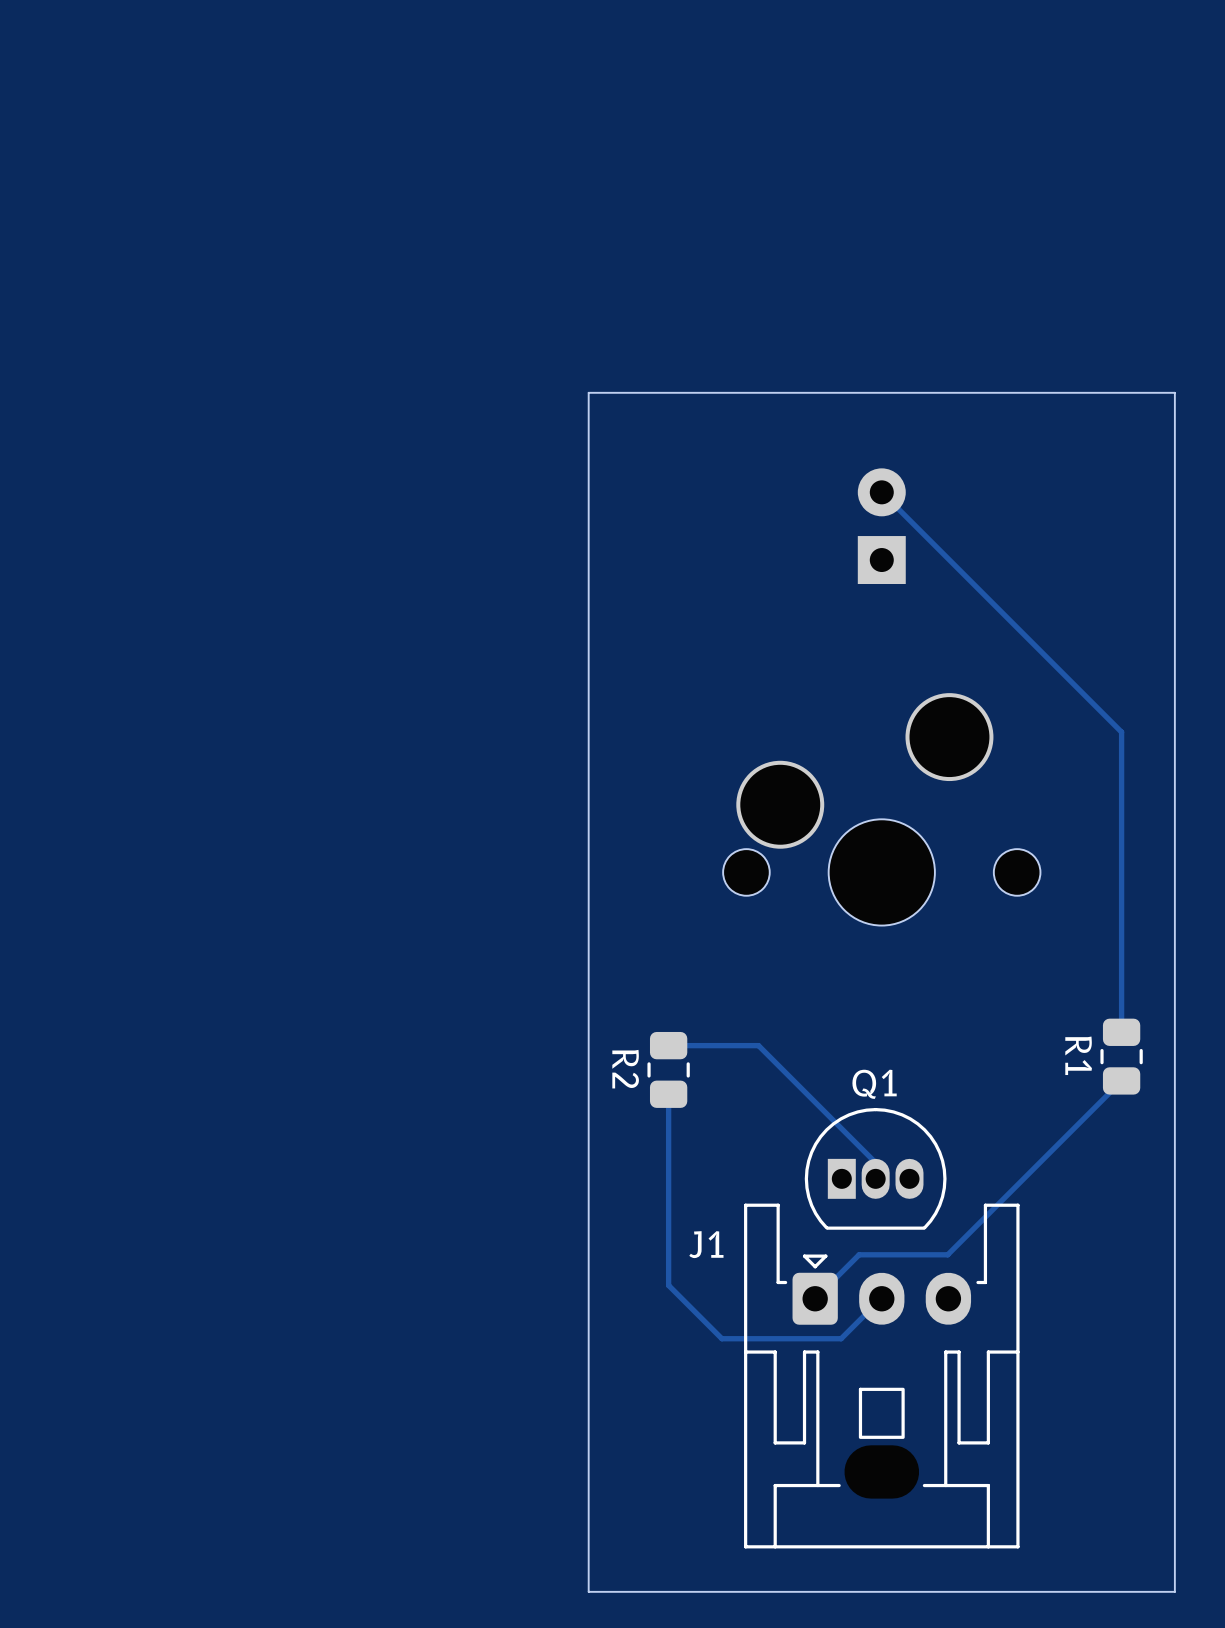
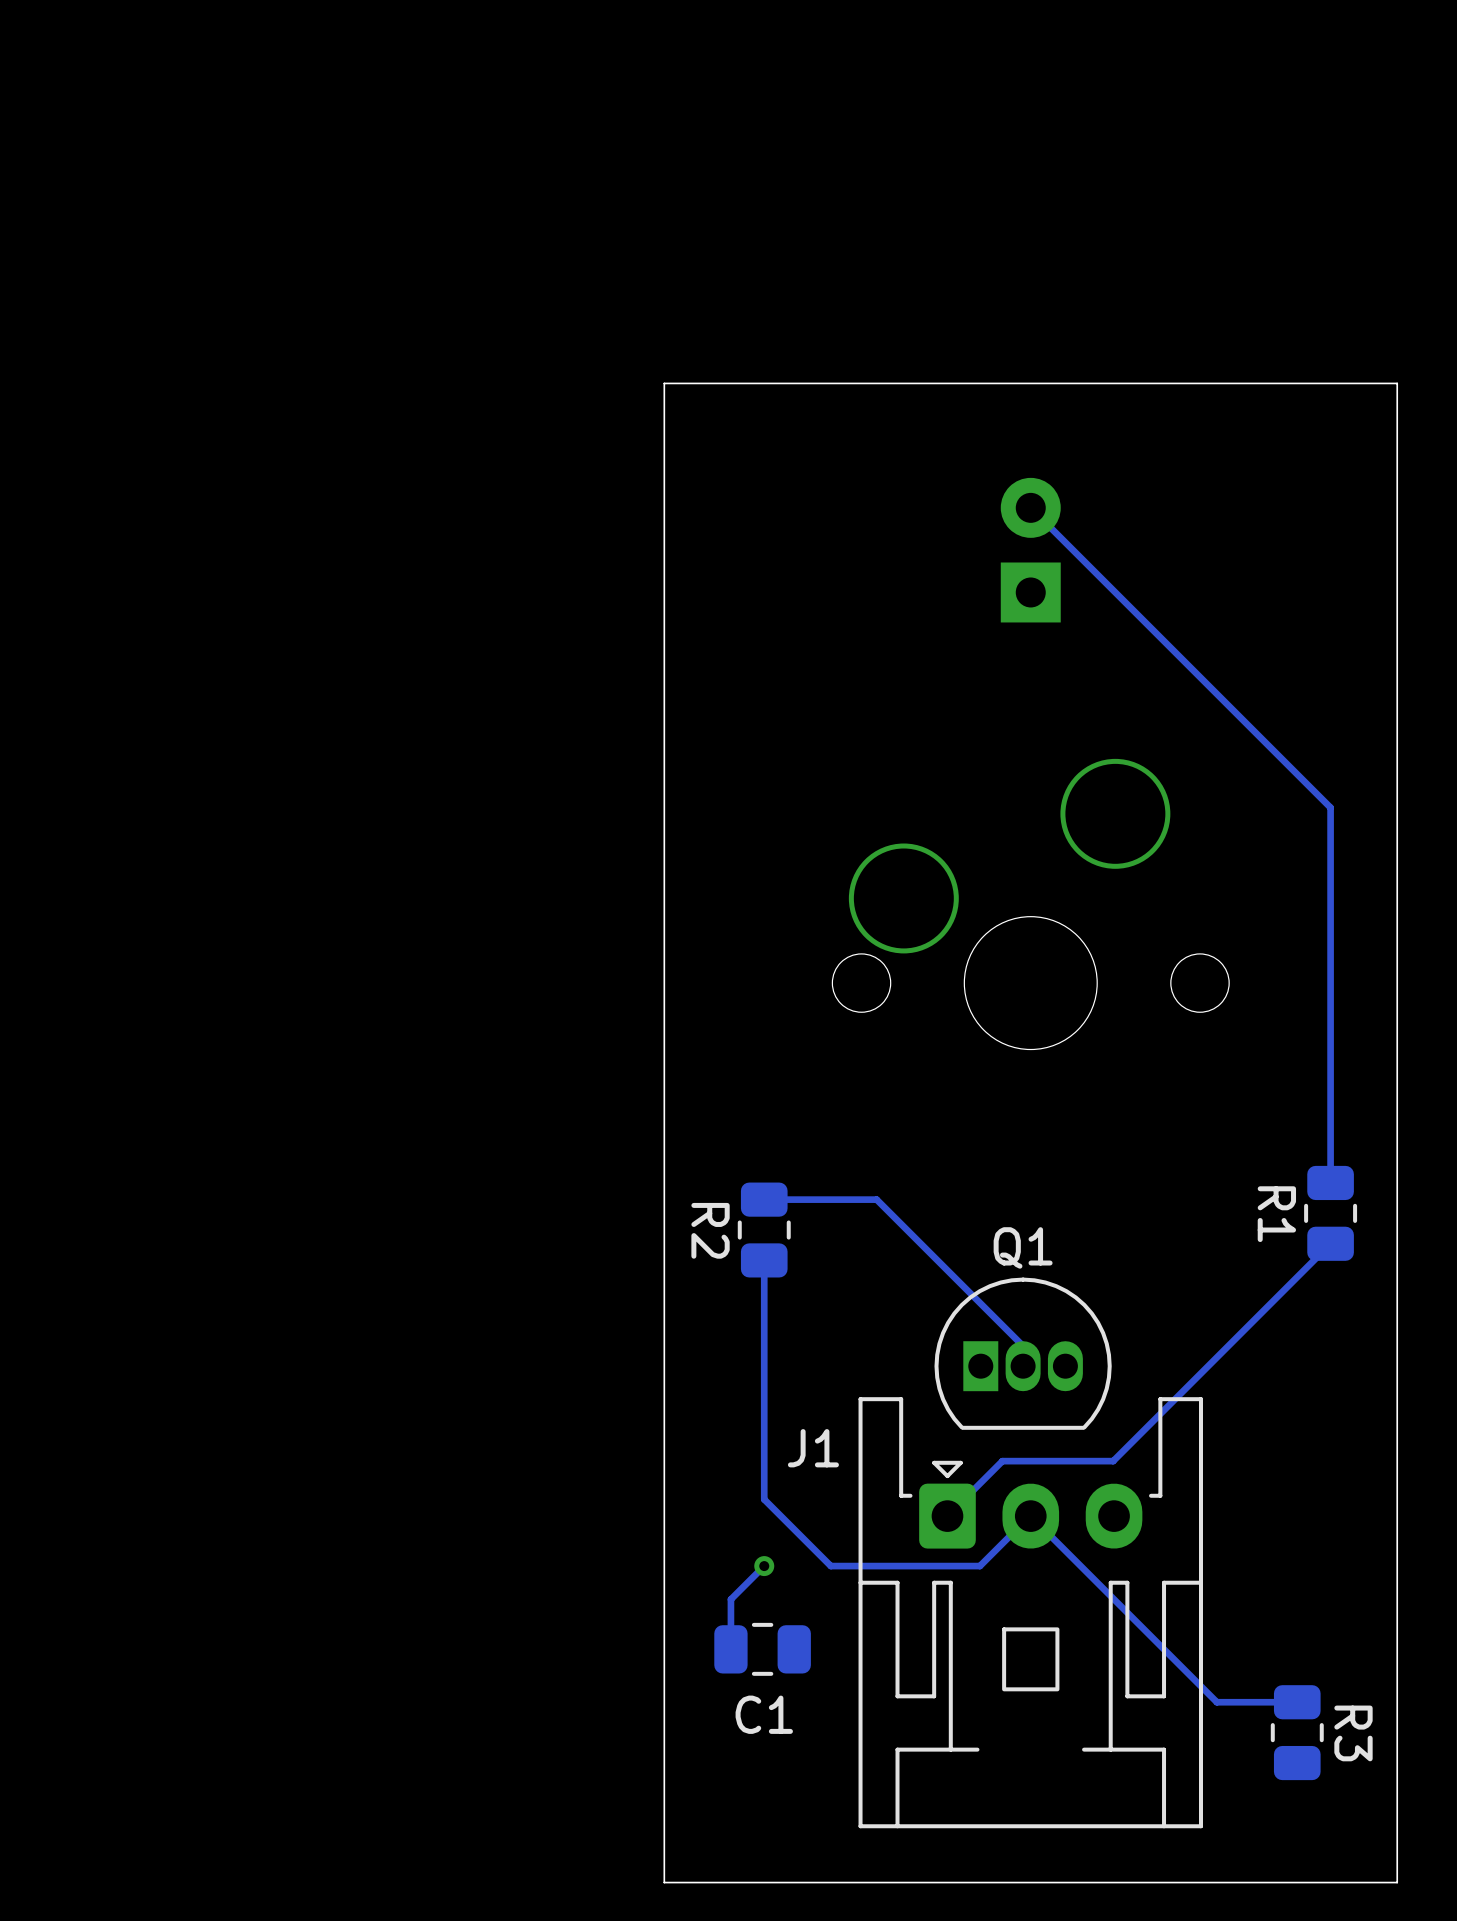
track: none -> (1030, 1516) (1216, 1702) (1297, 1702)
track: none -> (764, 1566) (730, 1599) (730, 1649)
via: none -> (764, 1566)
C1: none -> (762, 1649)
R3: none -> (1297, 1732)

